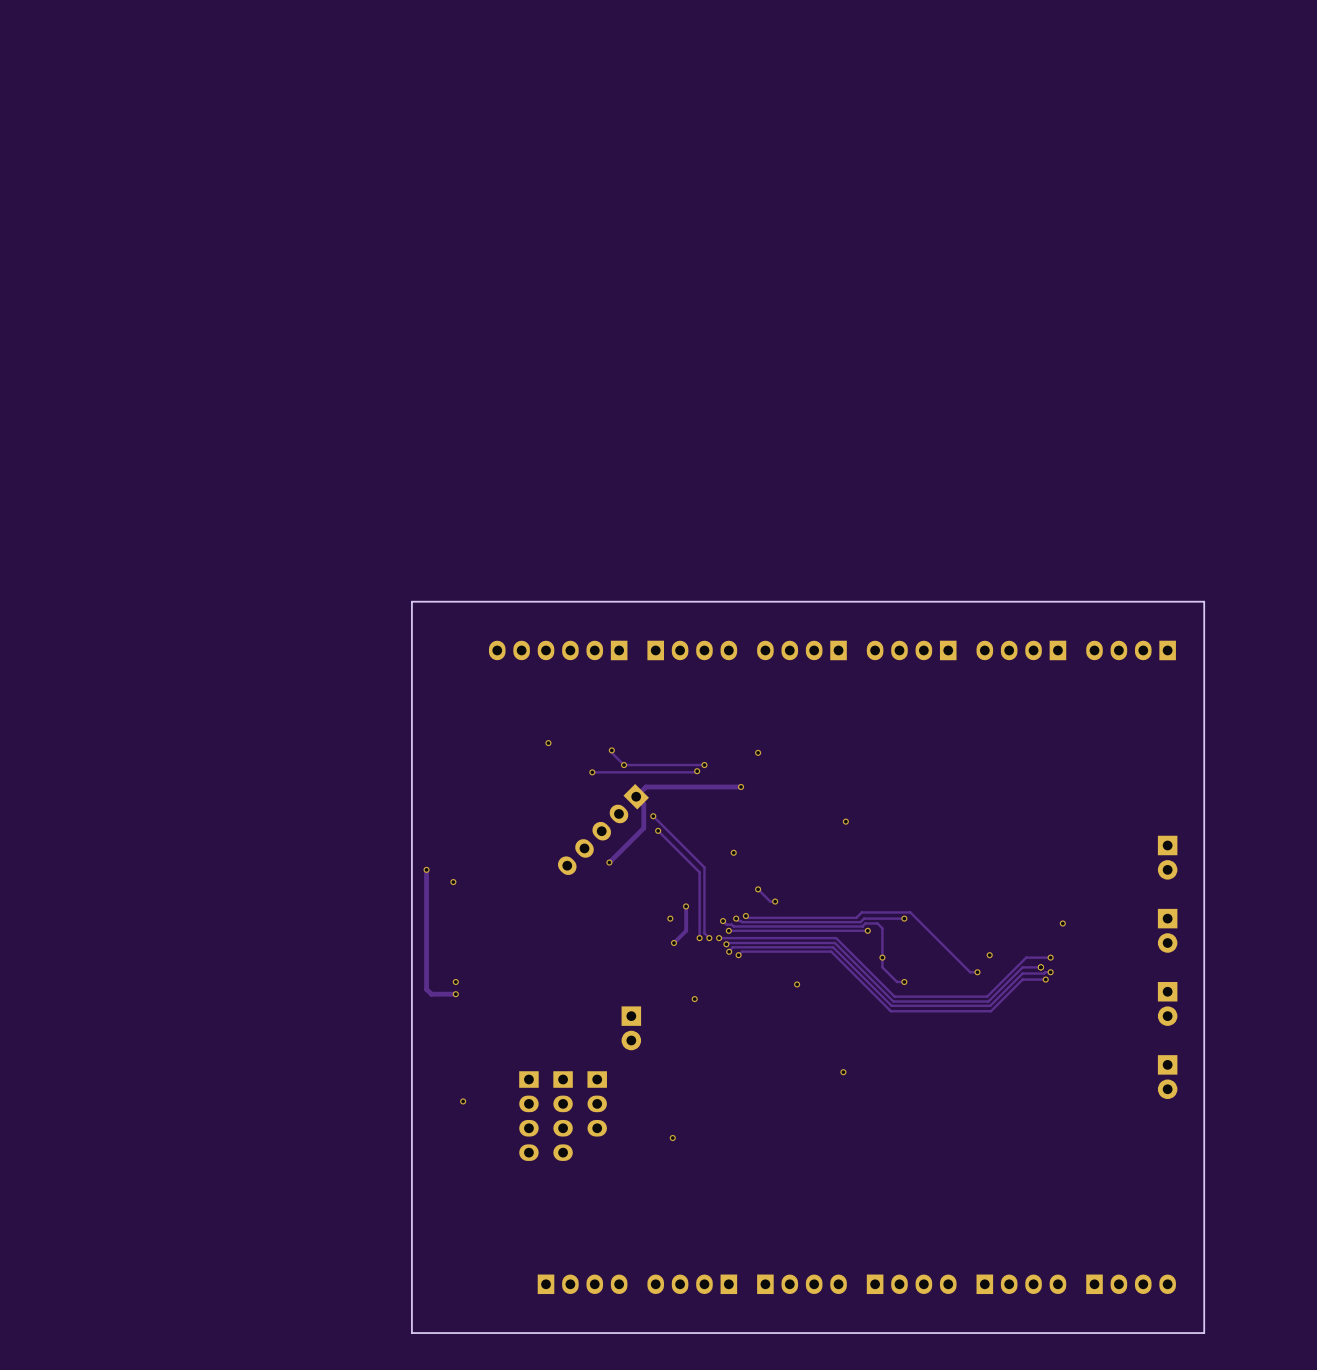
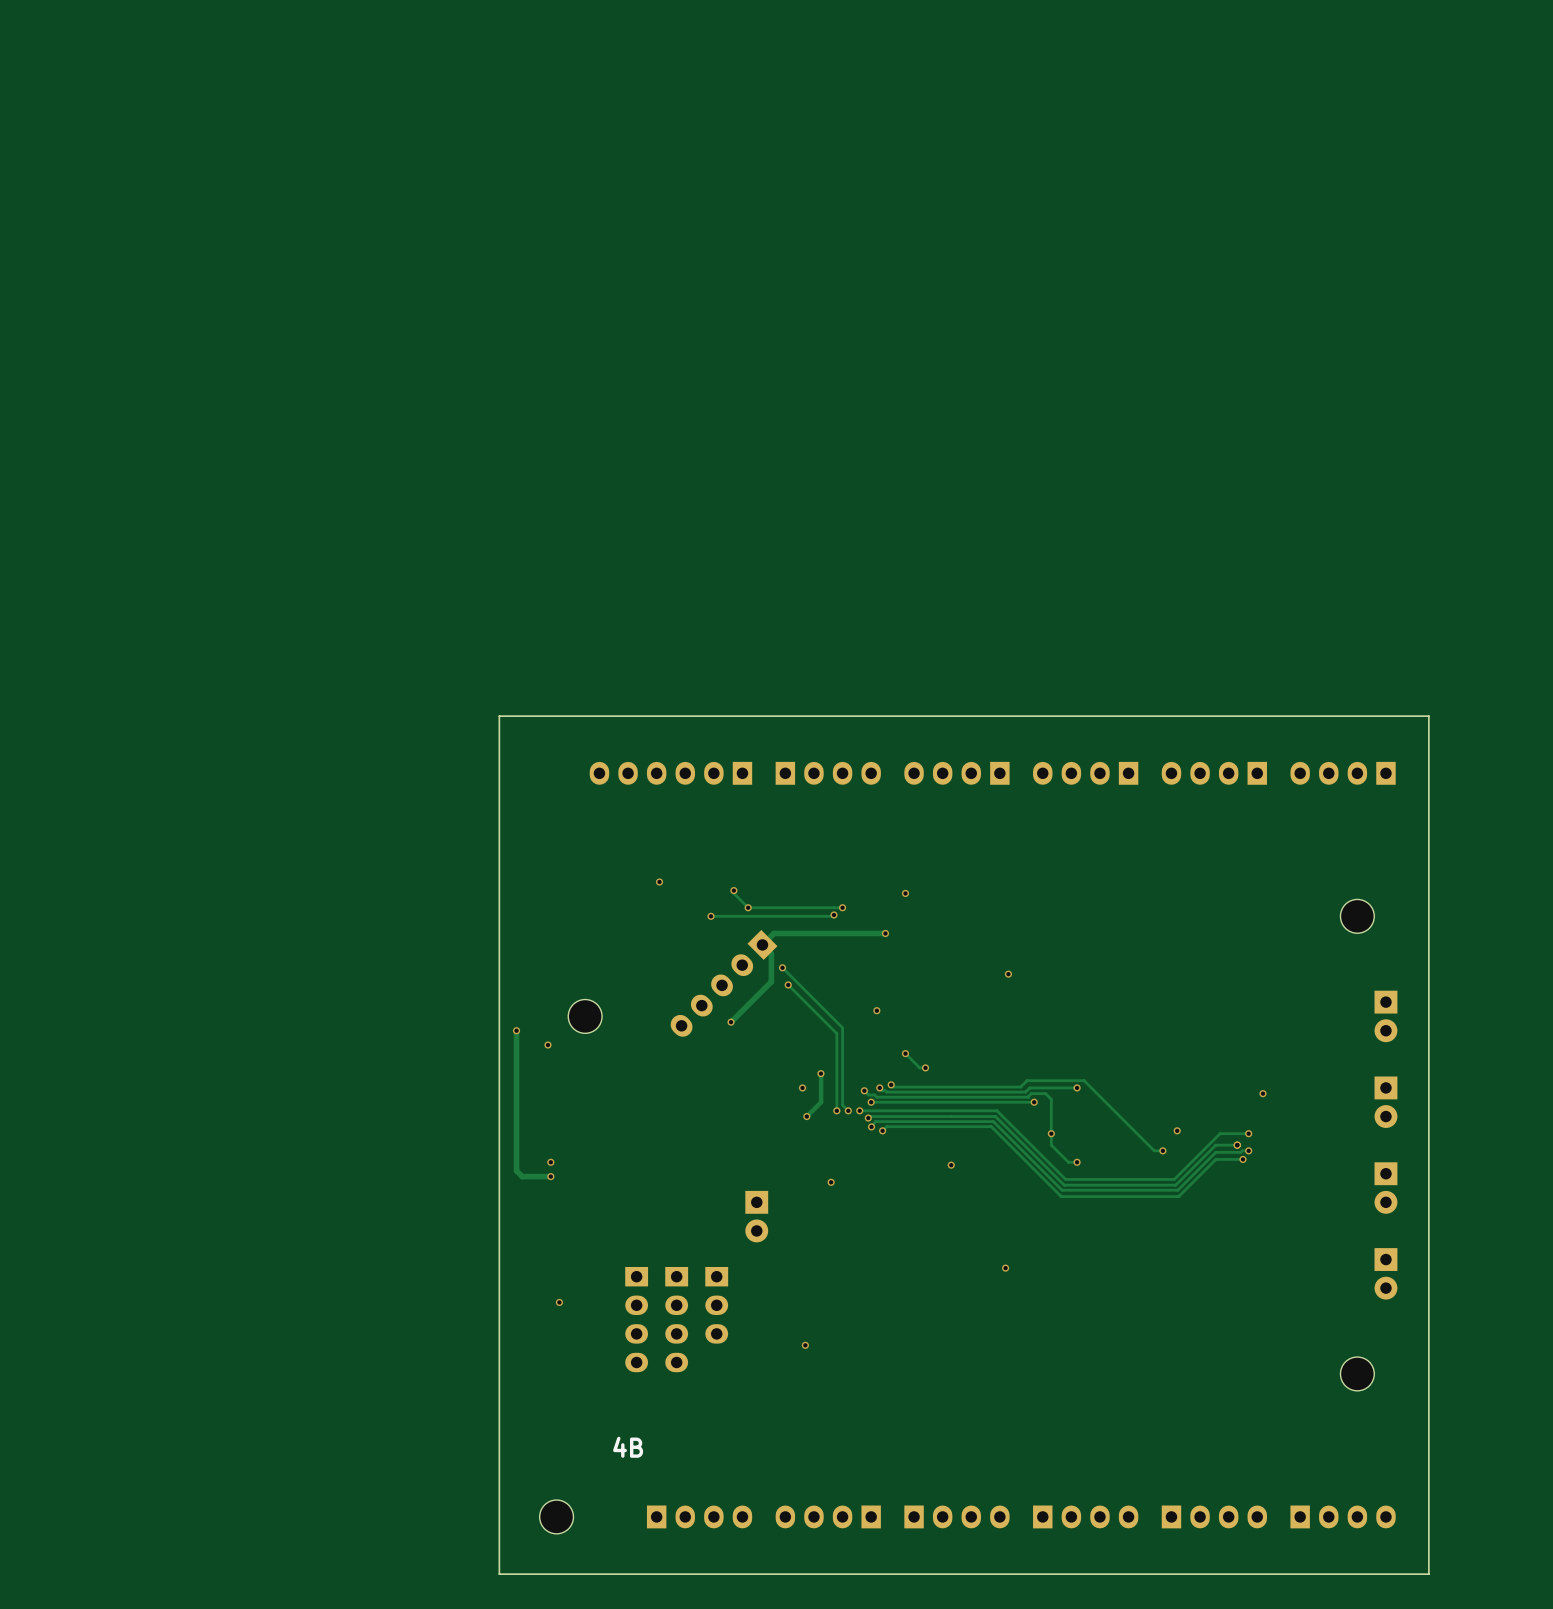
part: none -> (1357, 916)
part: none -> (585, 1016)
part: none -> (1357, 1373)
text: none -> 4B (628, 1447)
part: none -> (556, 1516)

